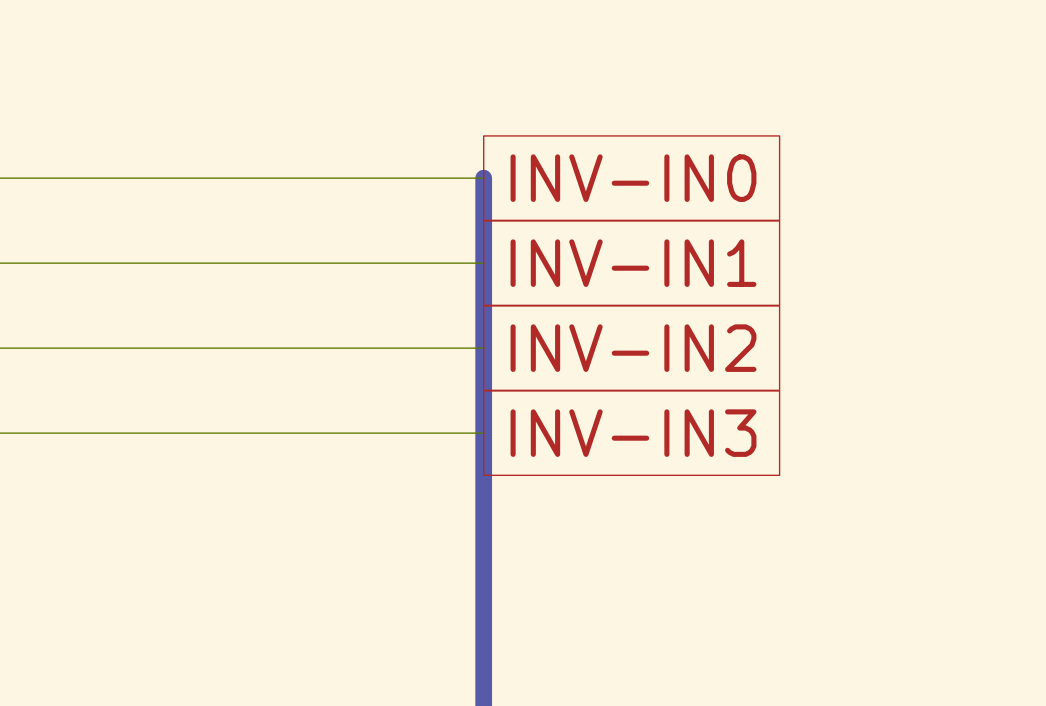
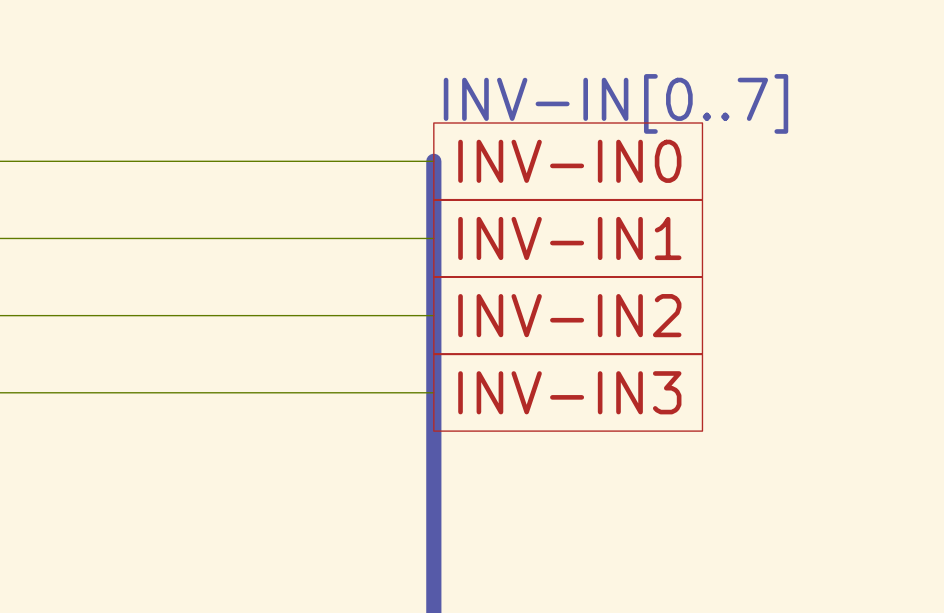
text: none -> INV-IN[0..7] (615, 103)

